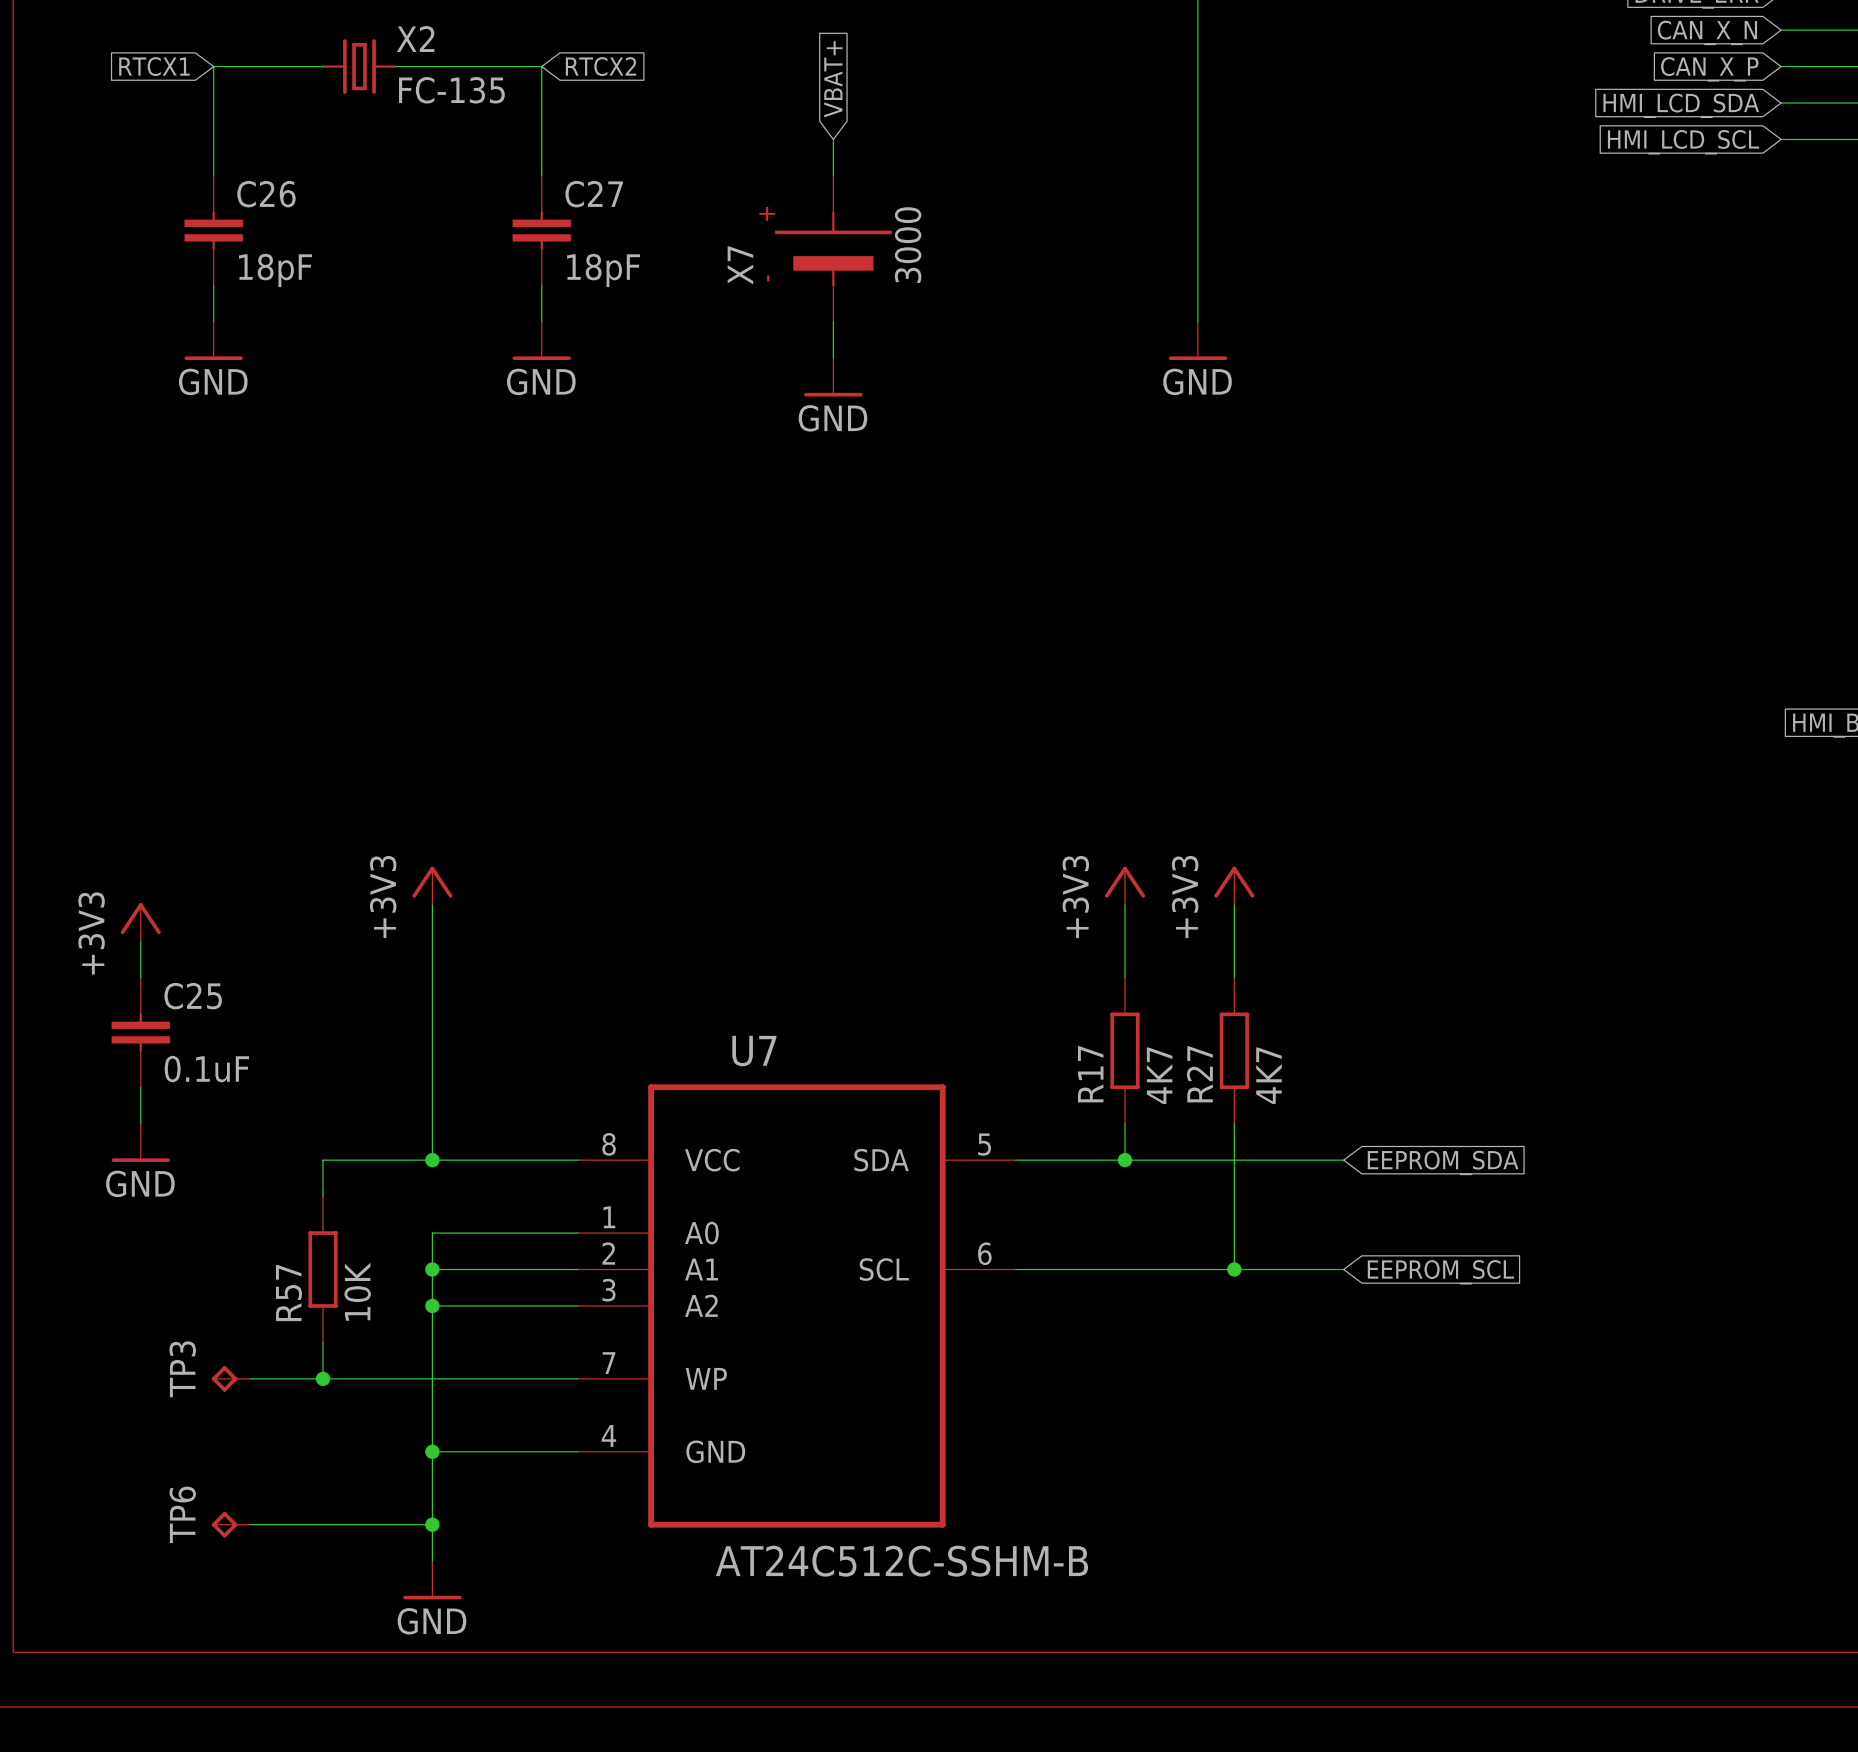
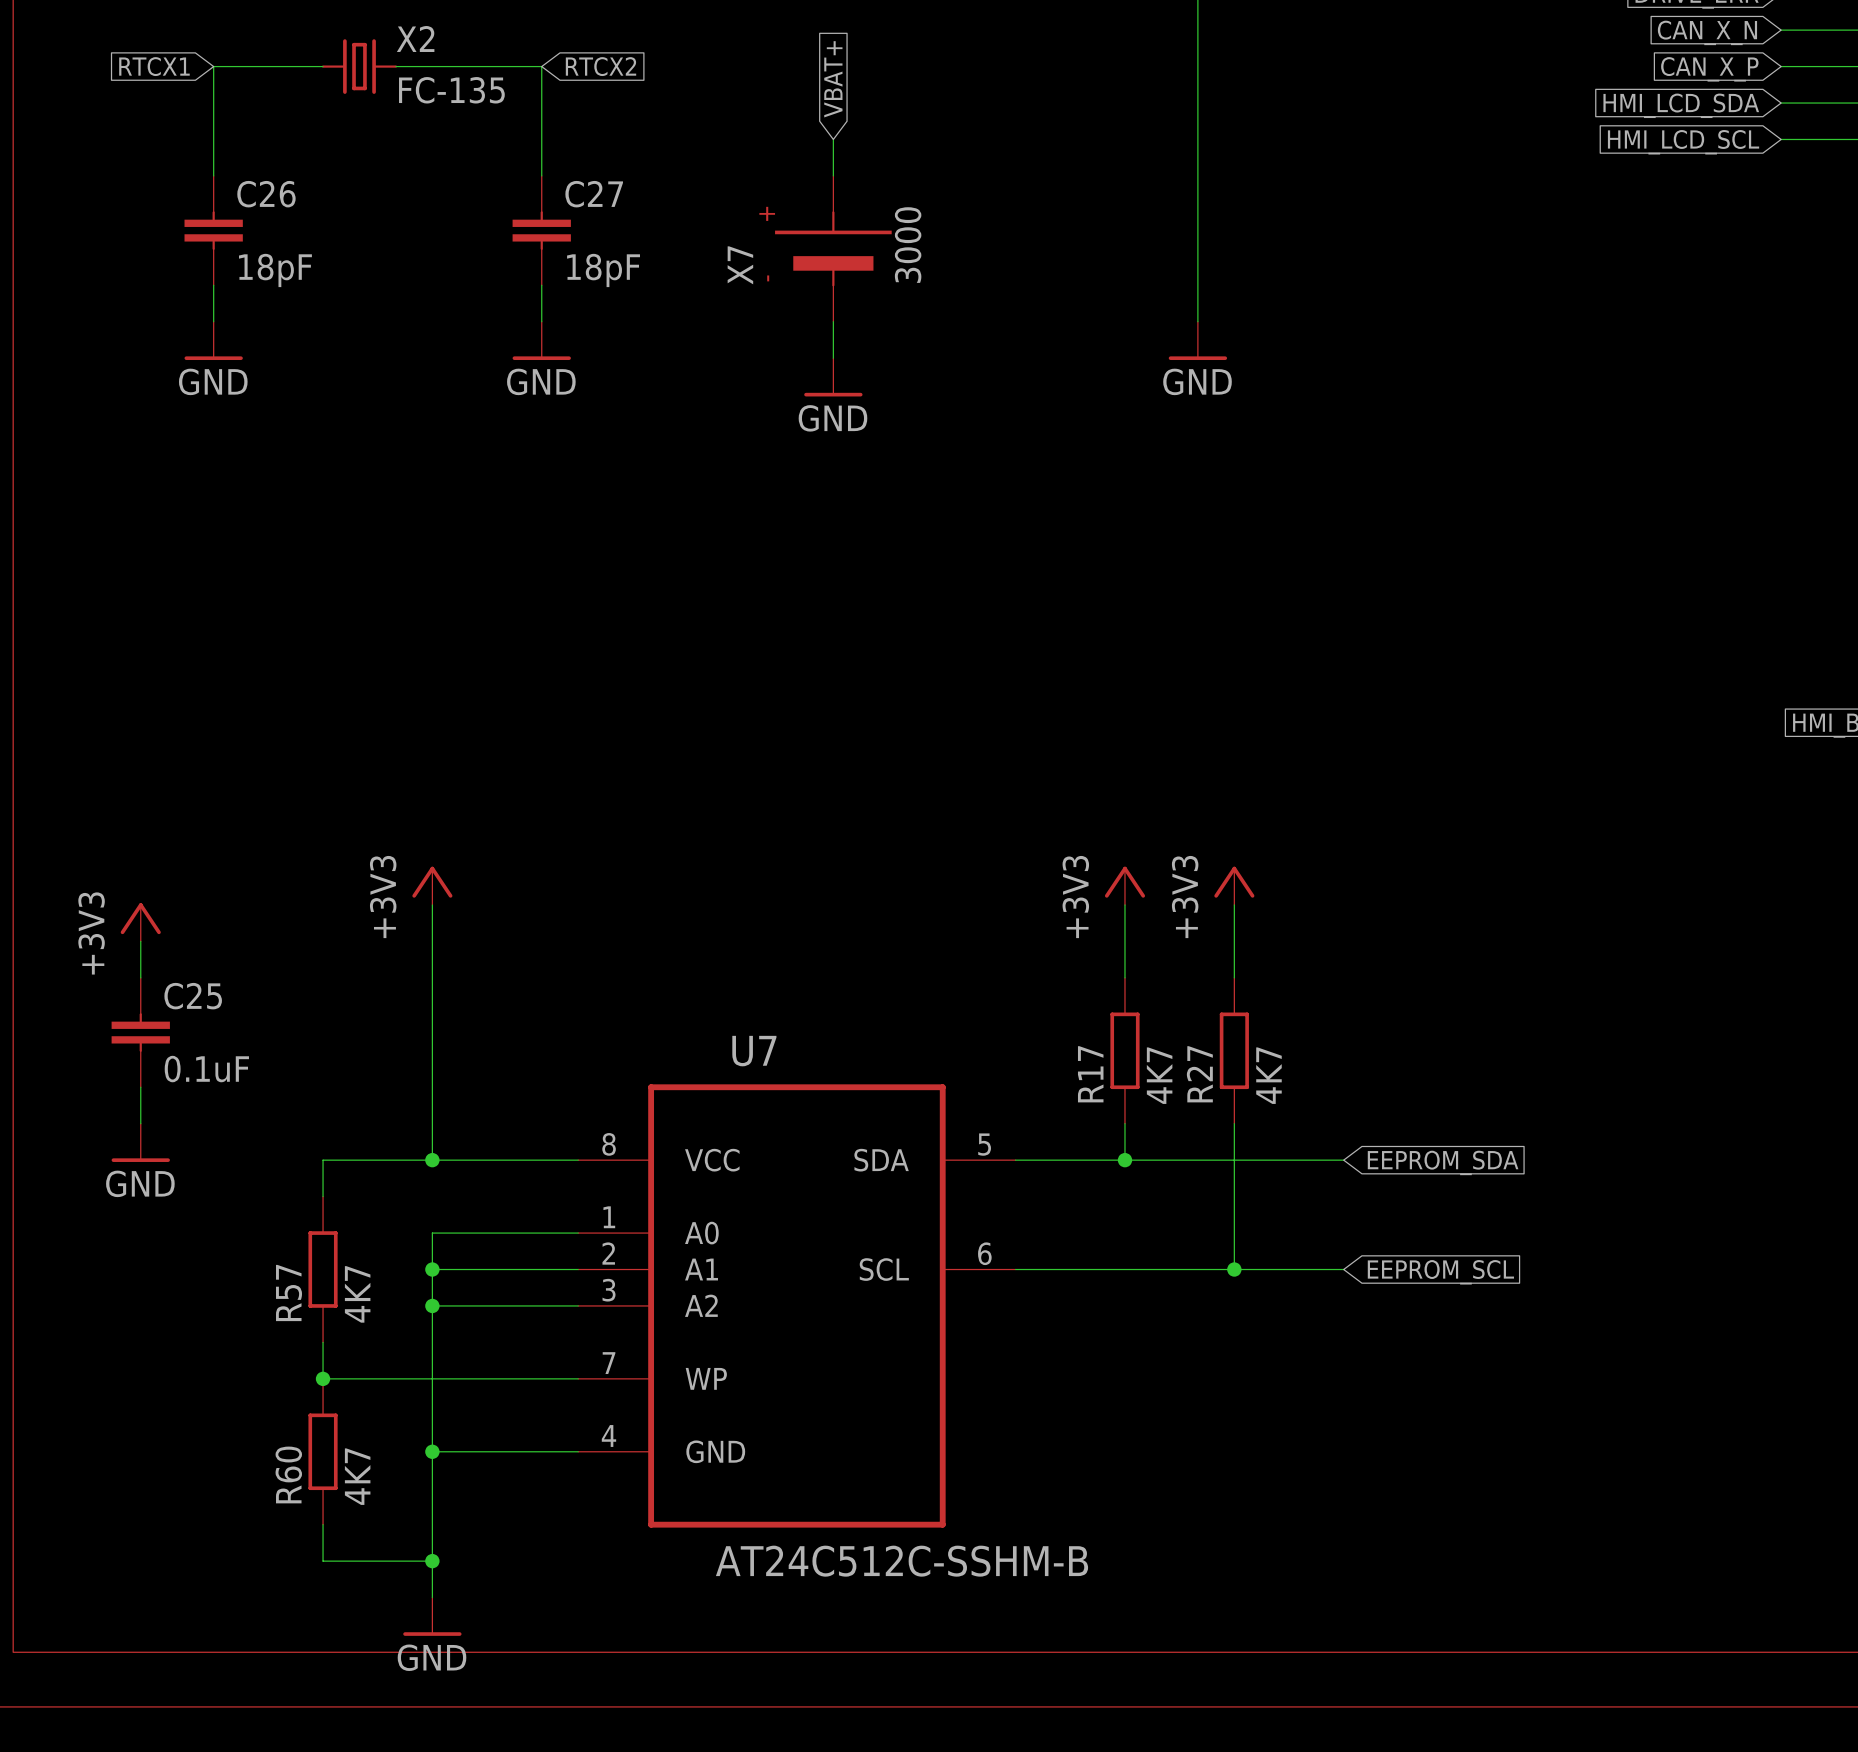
R57 value: 10K (357, 1291) -> 4K7 (357, 1294)
TP3: (230, 1378) -> none
wire: (250, 1378) (323, 1378) -> none
R60: none -> 4K7 (323, 1451)
TP6: (230, 1524) -> none
wire: (250, 1524) (432, 1524) -> none
wire: none -> (323, 1524) (323, 1561) (432, 1561) (432, 1597)
junction position: (432, 1524) -> (432, 1561)
power symbol position: GND (432, 1580) -> GND (432, 1616)

